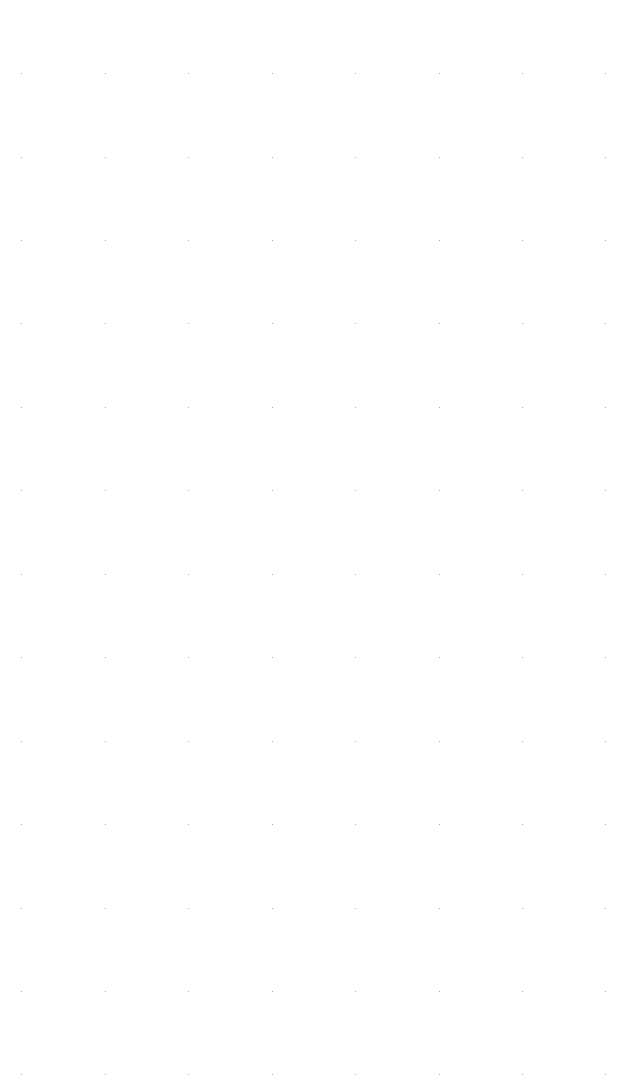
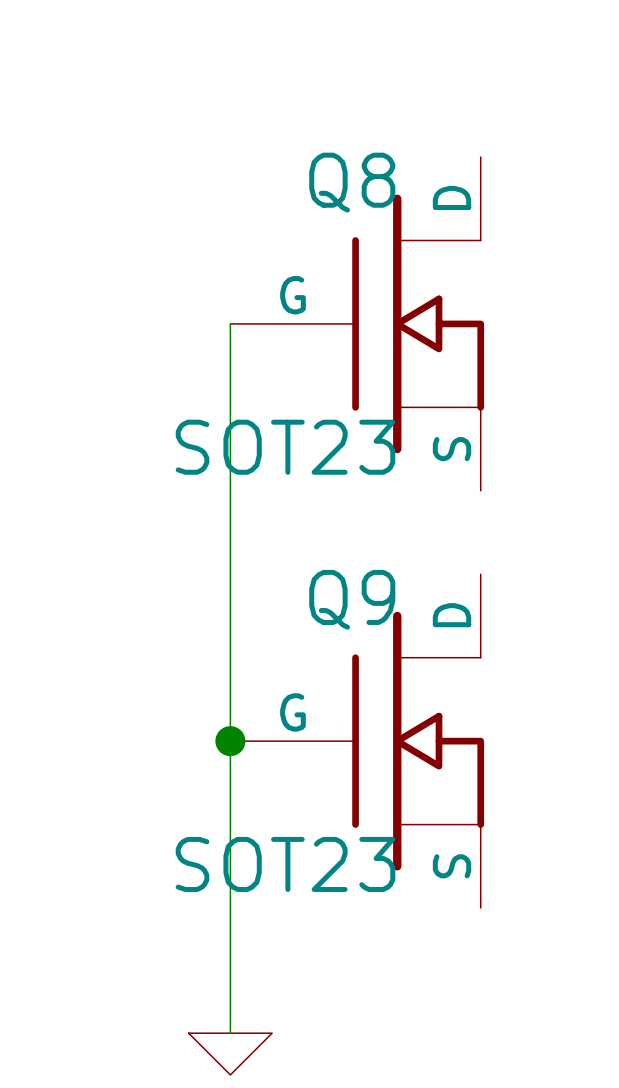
wire: none -> (230, 323) (230, 1033)
Q8: none -> SOT23 (357, 323)
junction: none -> (230, 741)
Q9: none -> SOT23 (357, 741)
power symbol: none -> (230, 1054)

